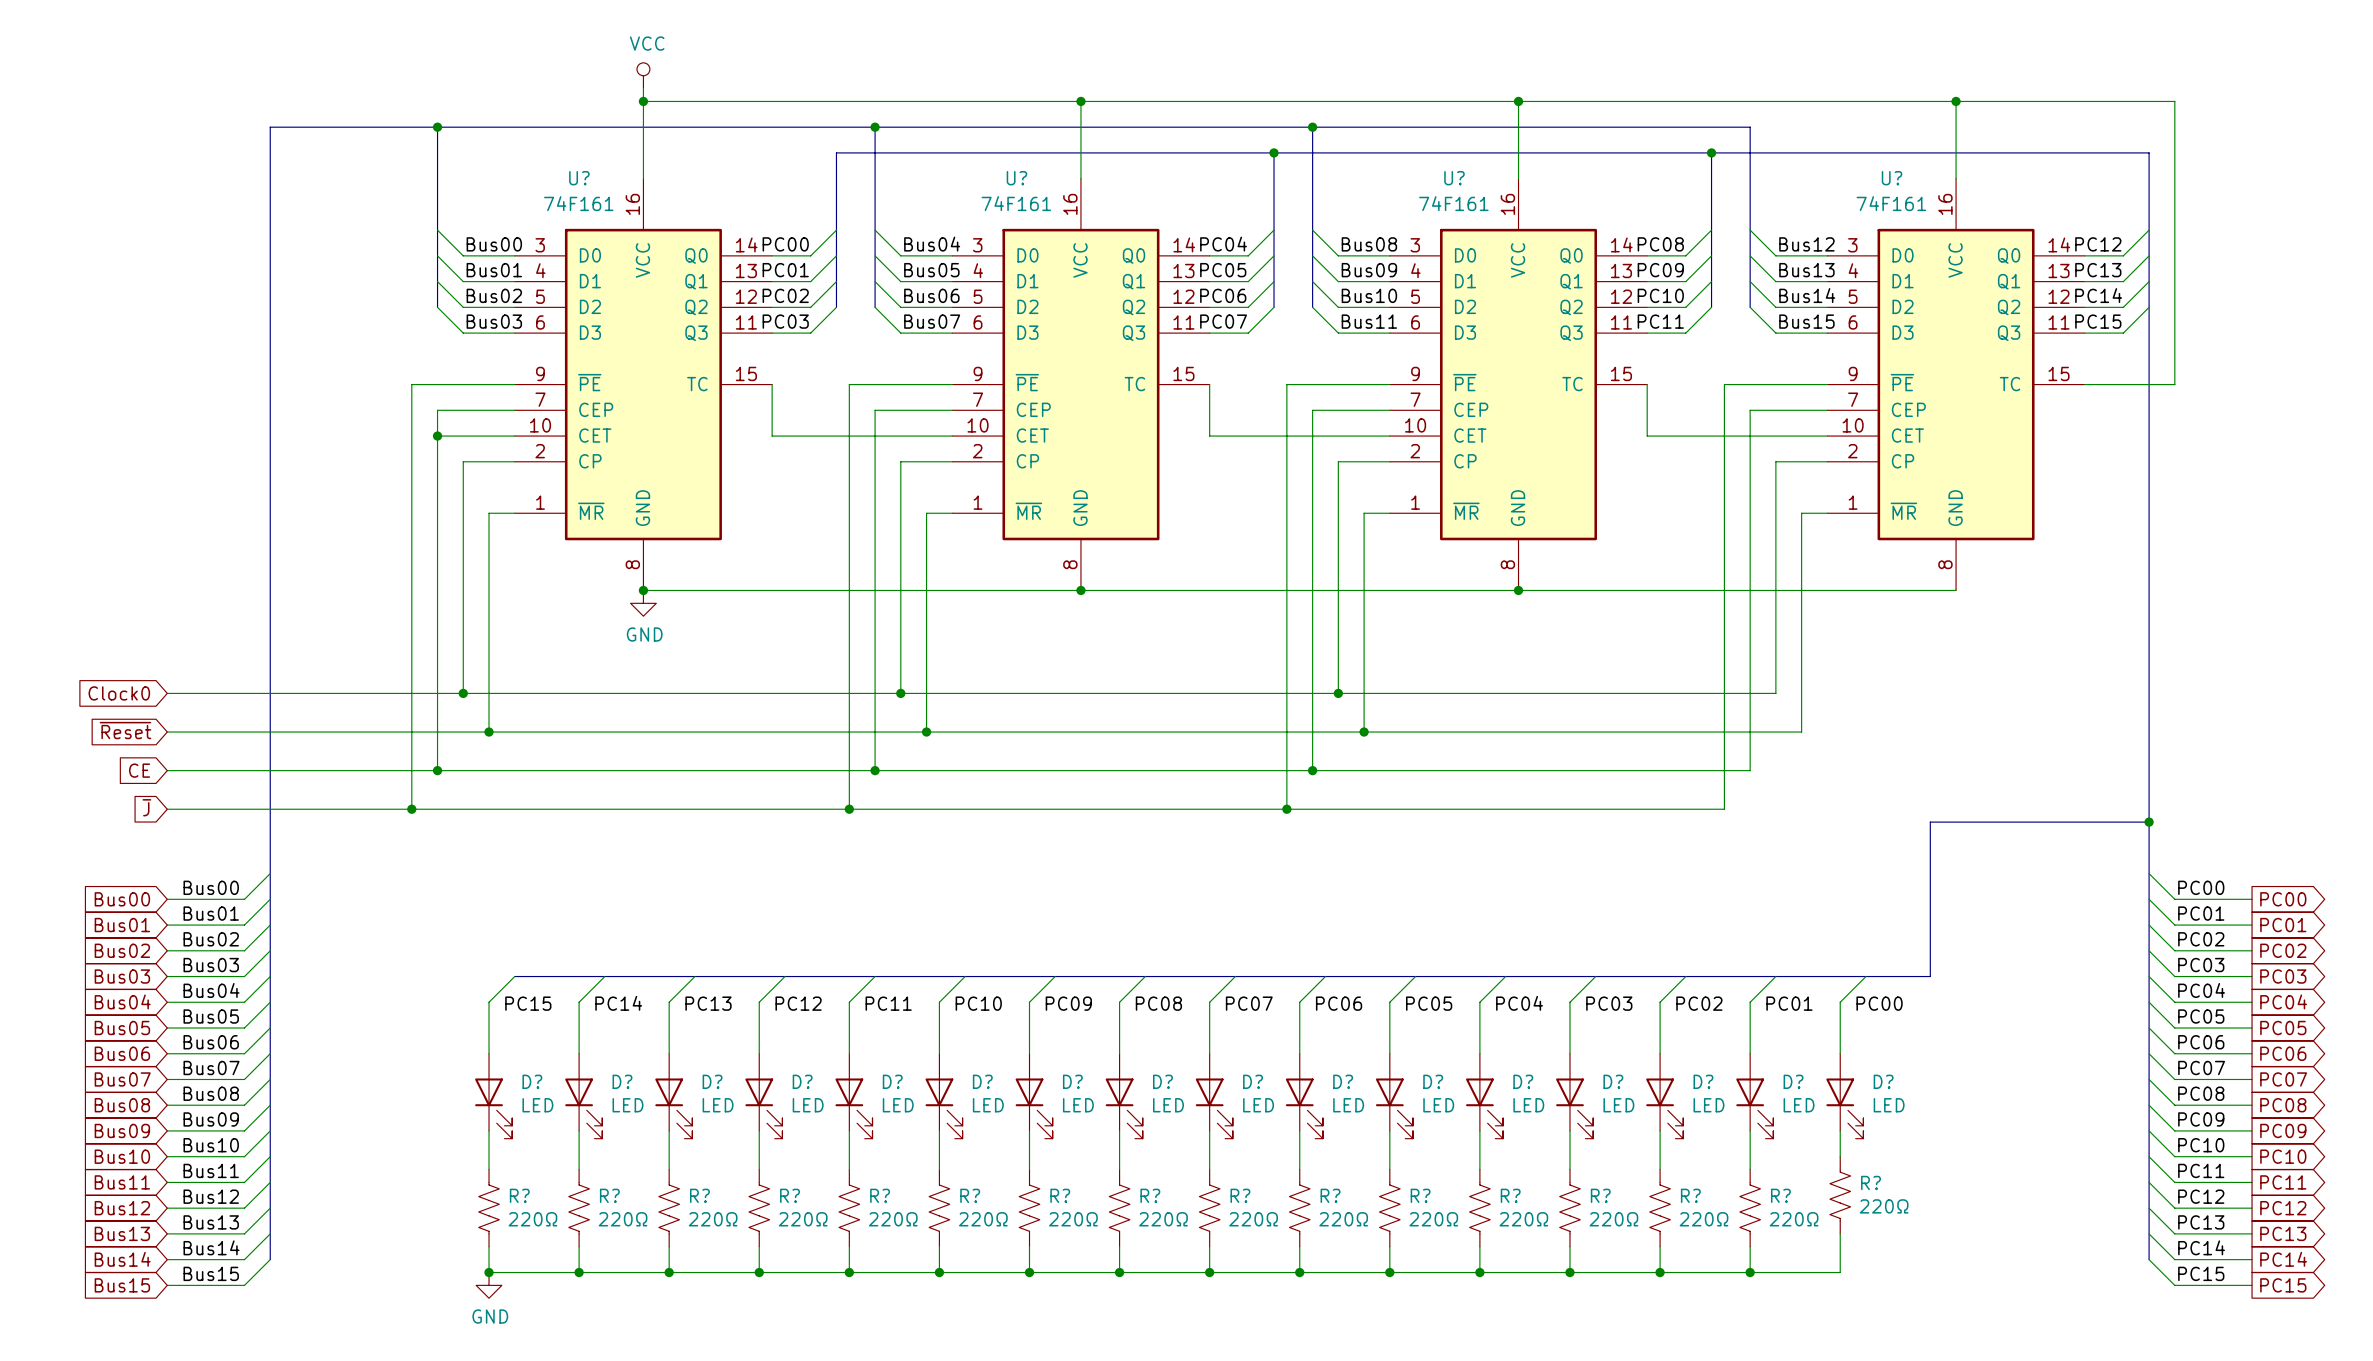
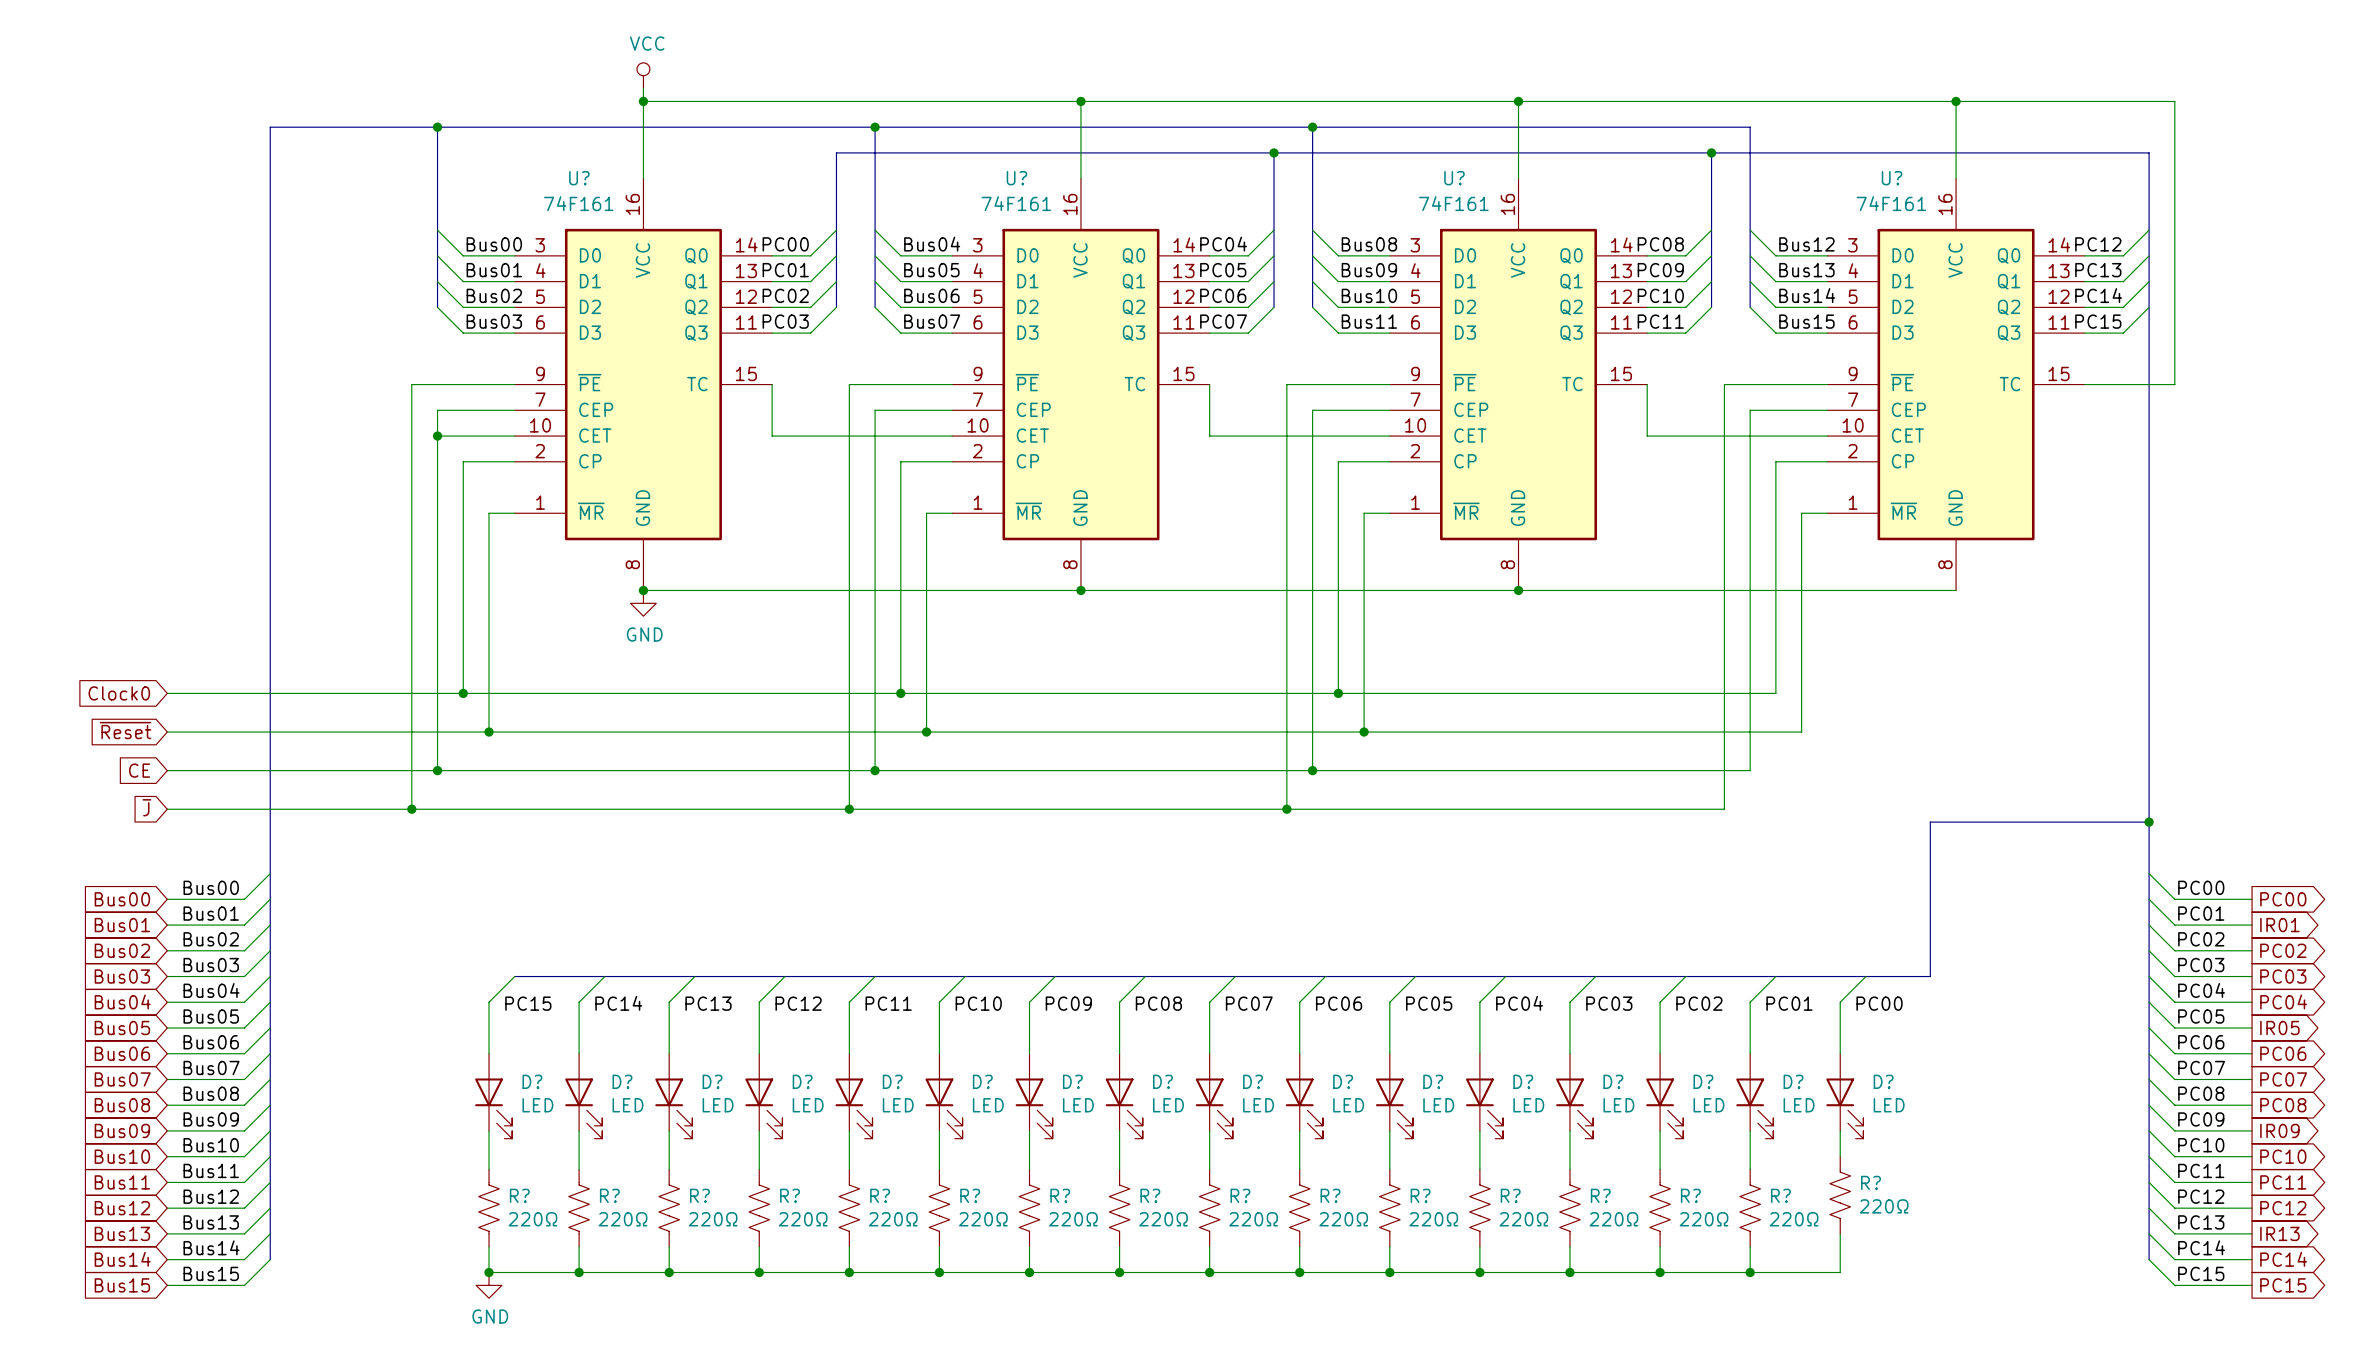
global label: PC01 (2283, 925) -> IR01 (2279, 925)
global label: PC05 (2283, 1028) -> IR05 (2279, 1028)
global label: PC09 (2283, 1130) -> IR09 (2279, 1130)
global label: PC13 (2283, 1233) -> IR13 (2279, 1233)

